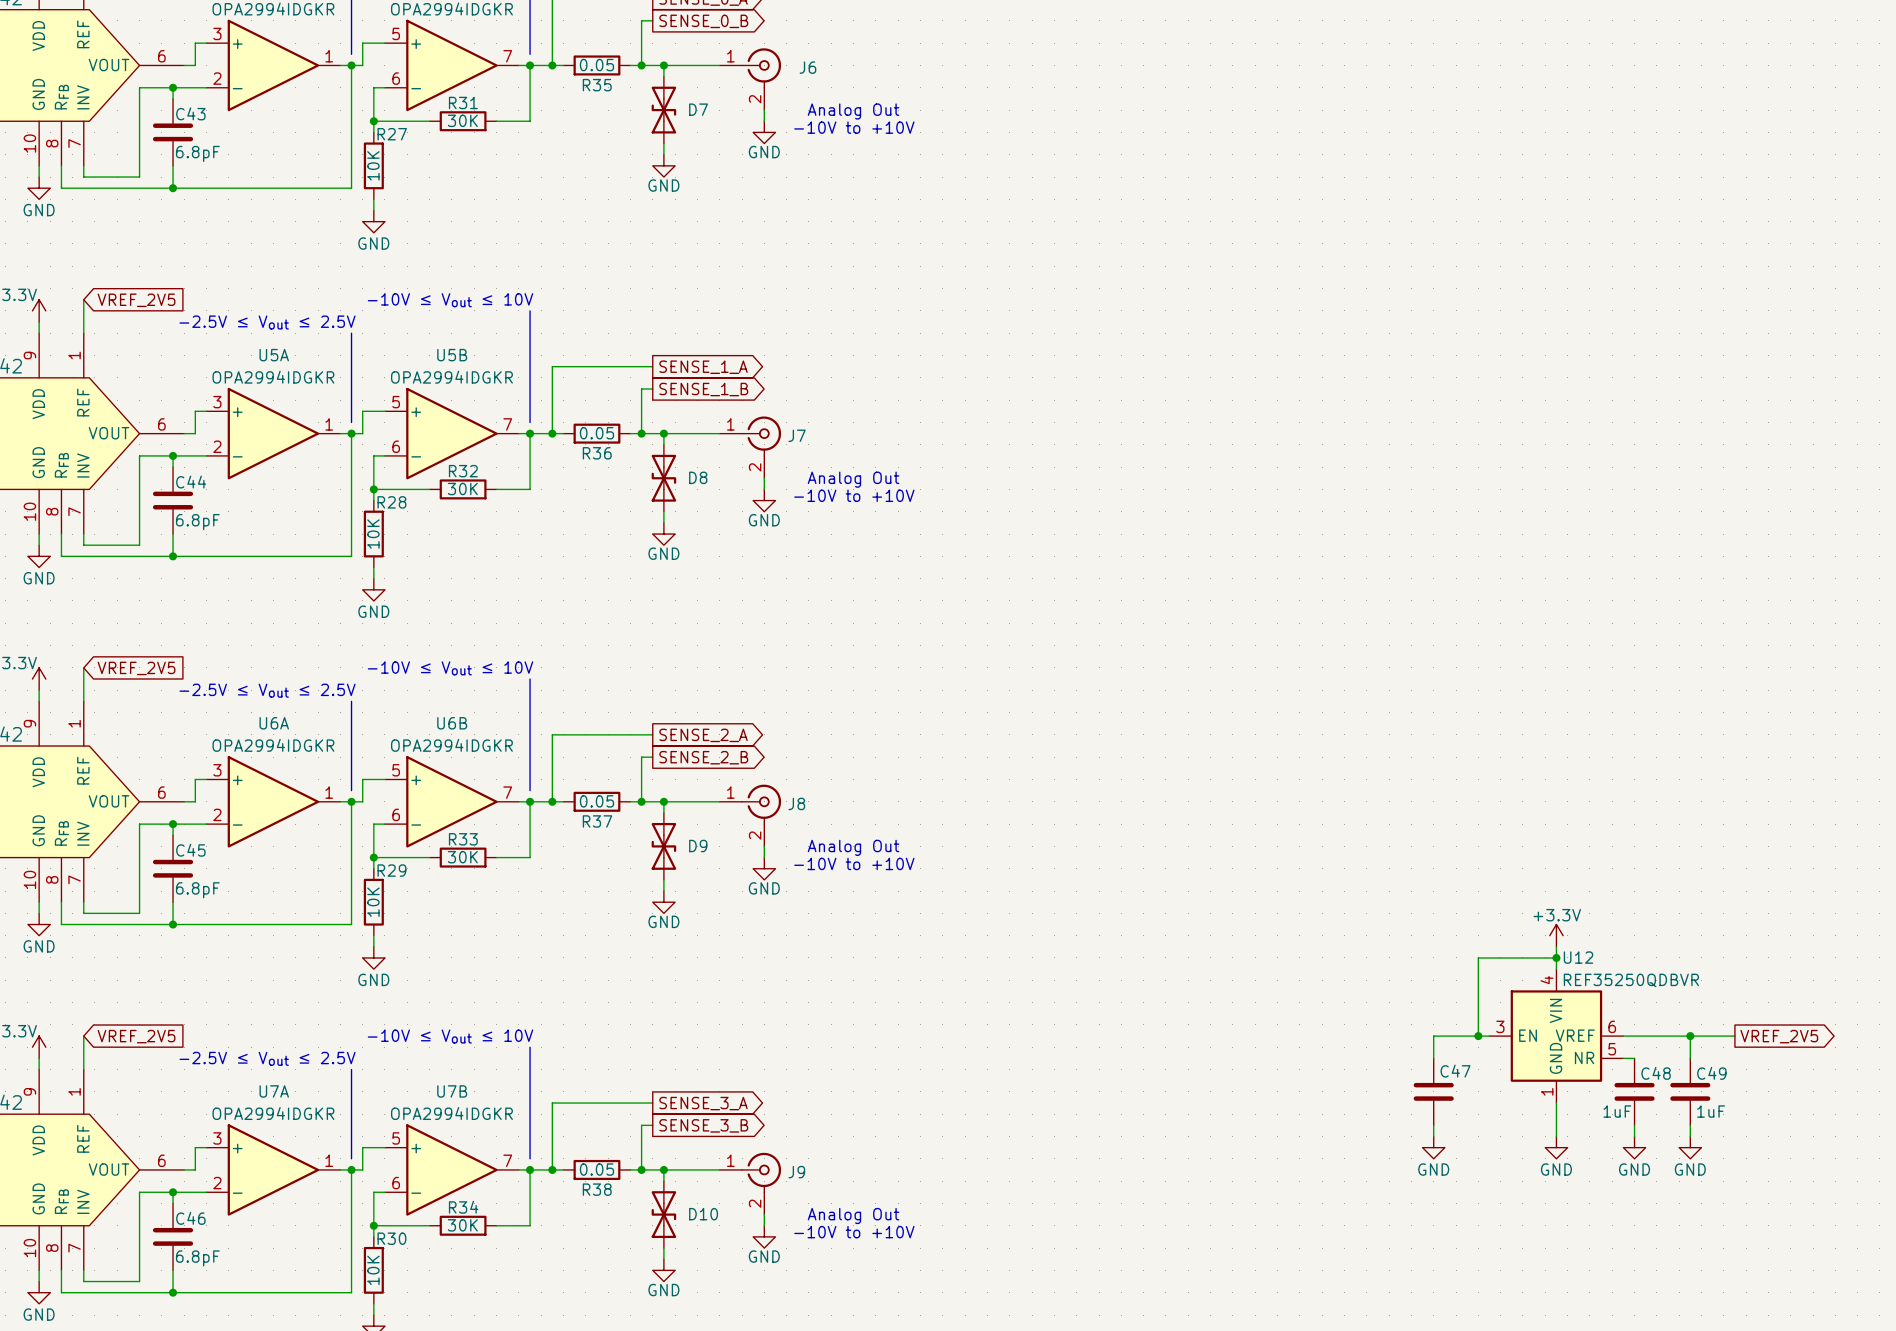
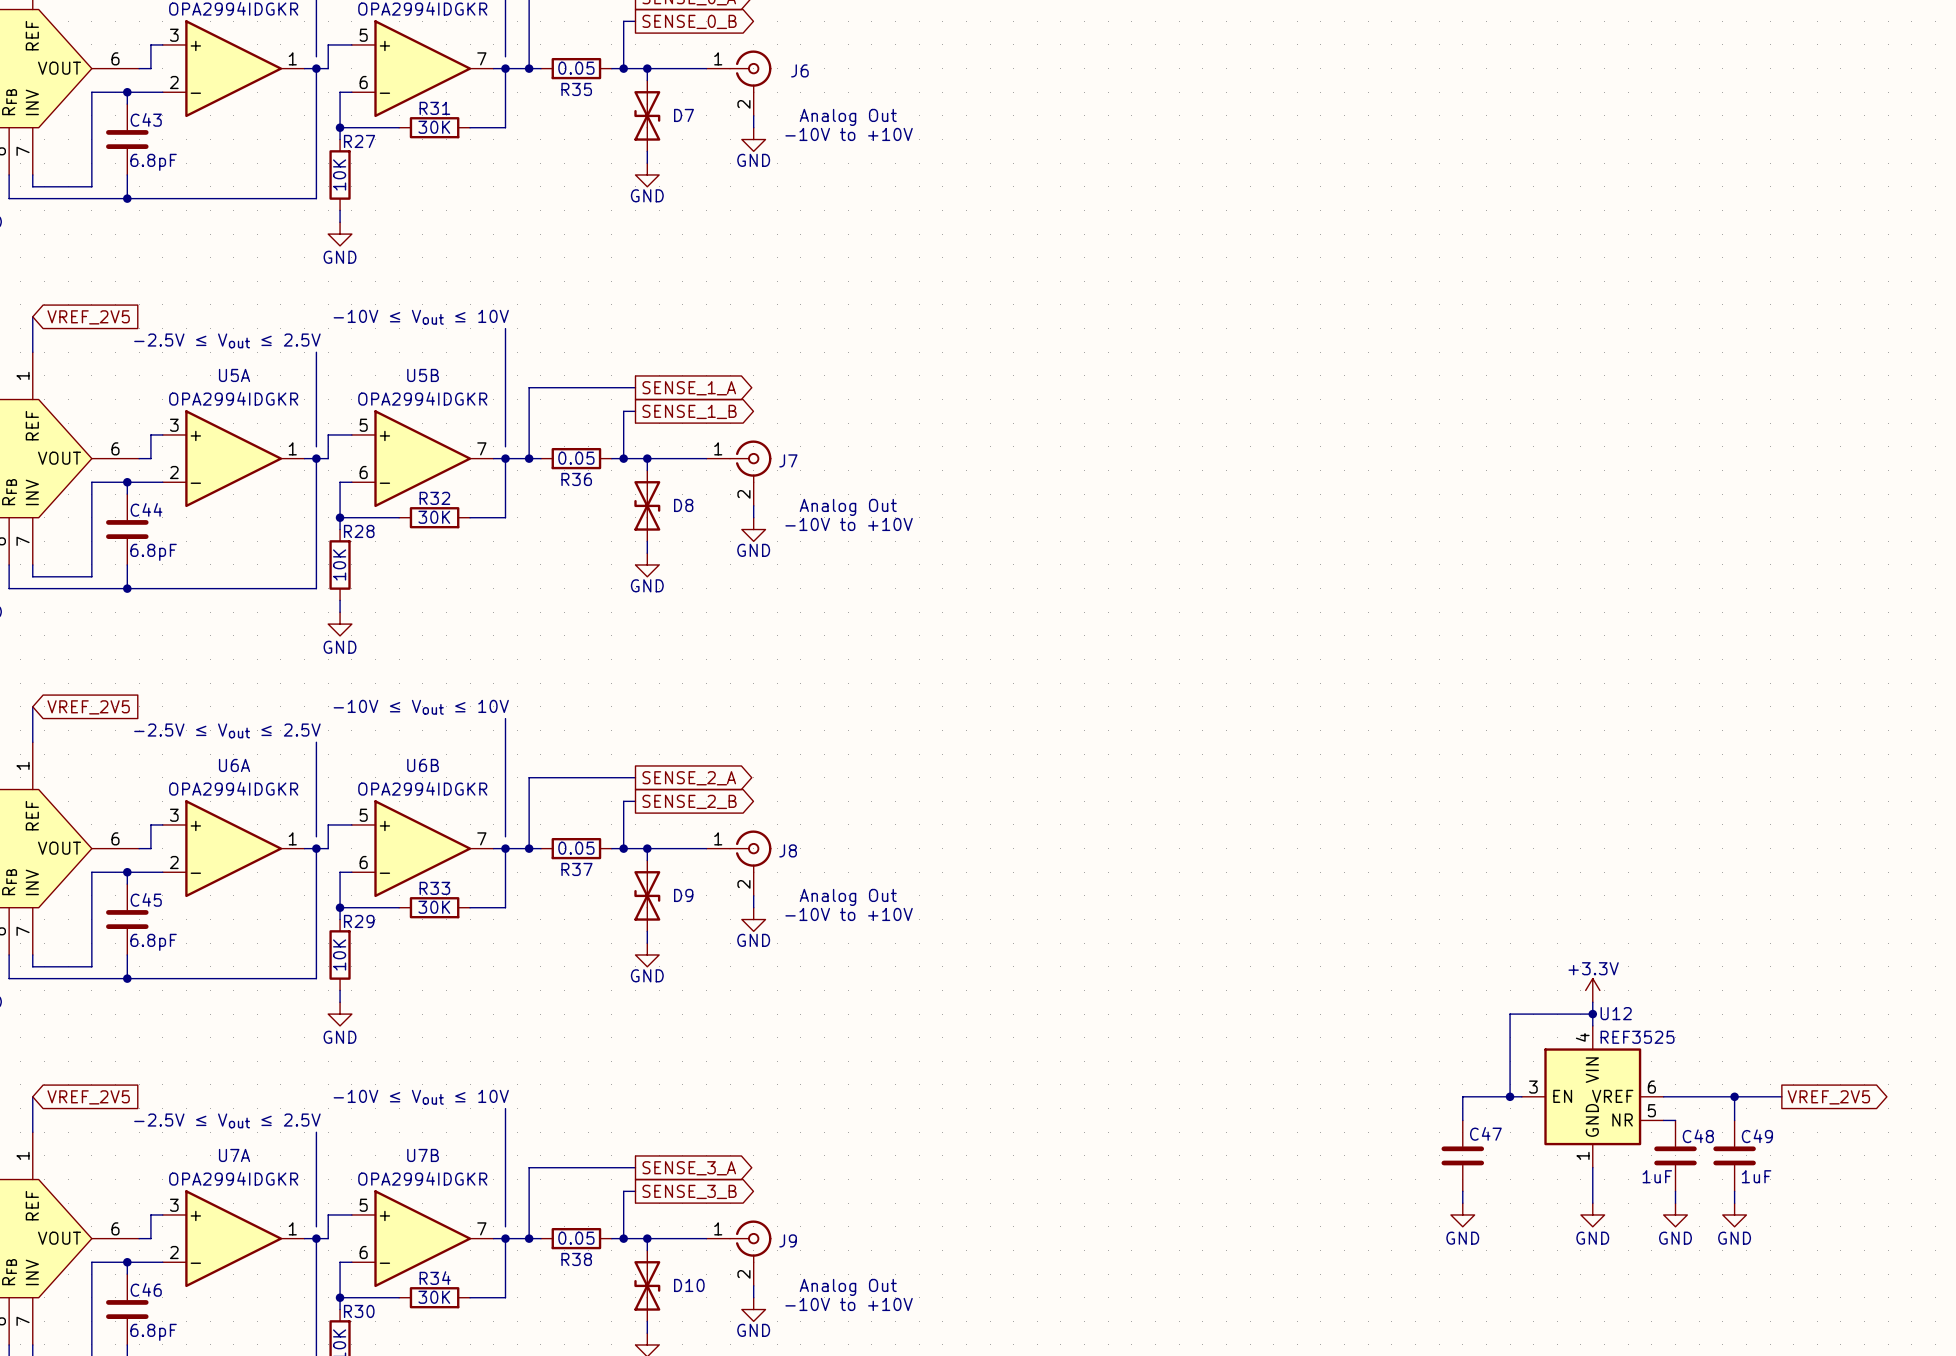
U12 value: REF35250QDBVR (1631, 980) -> REF3525 (1637, 1037)

